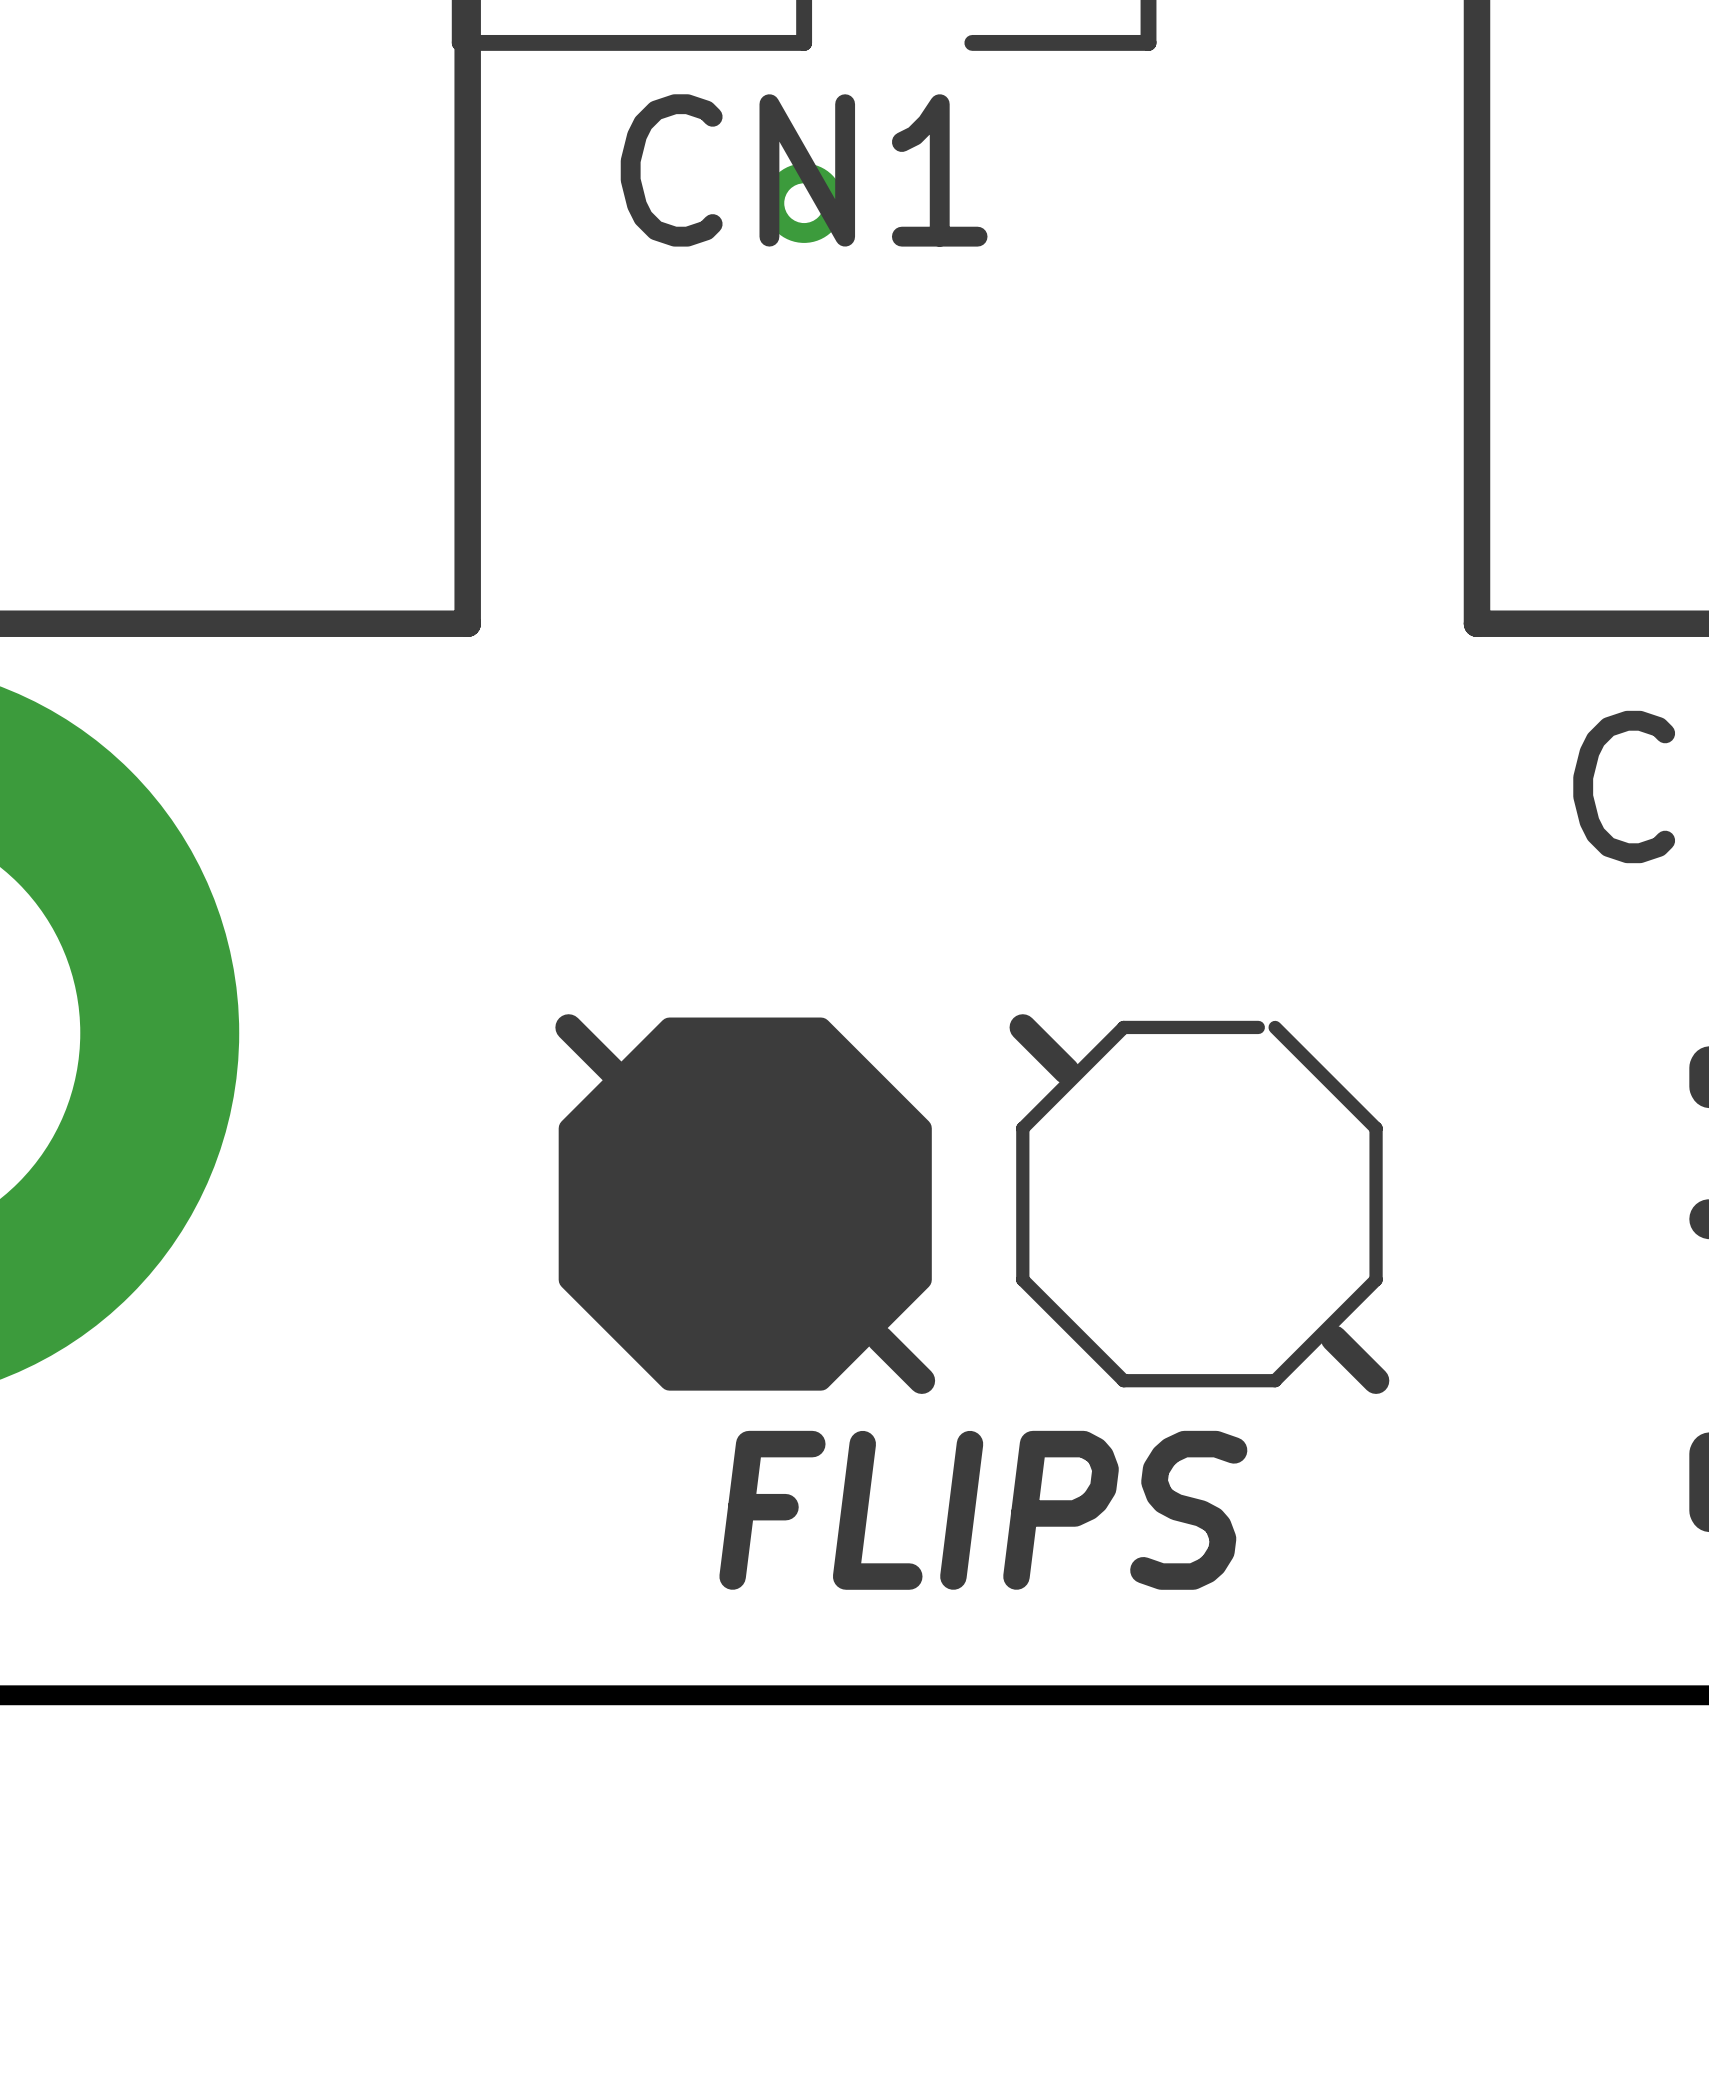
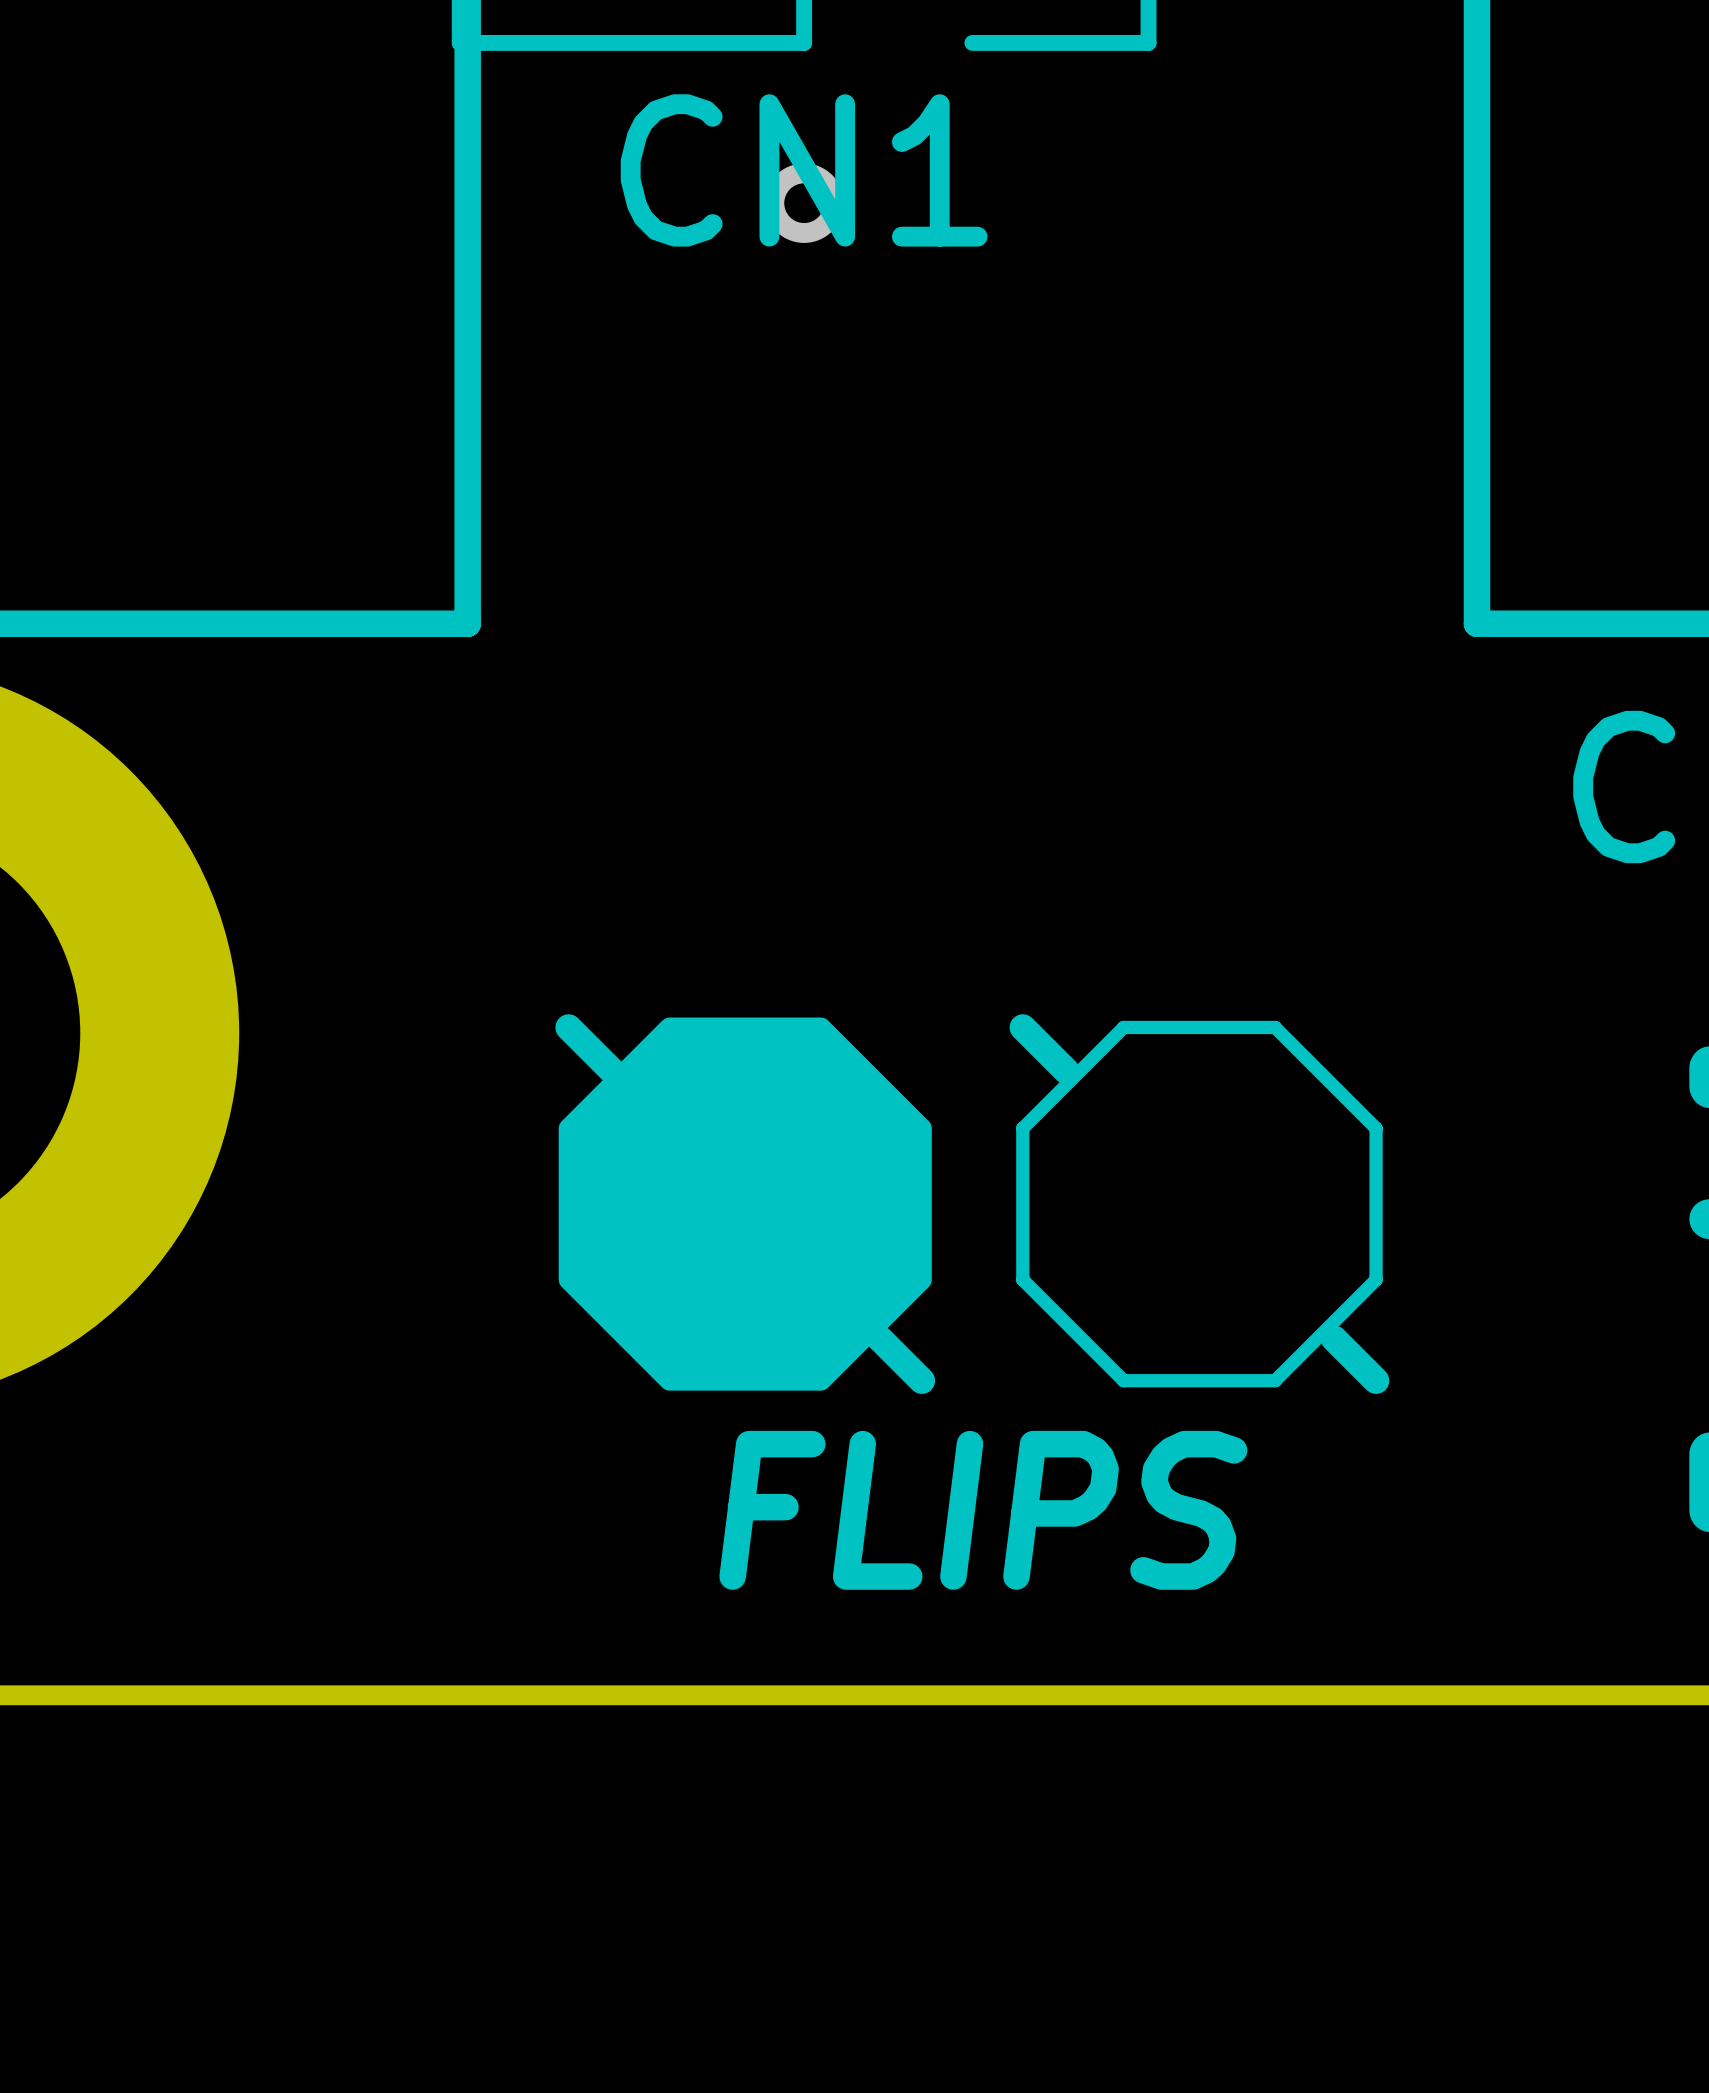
drawing shape: [555, 1014, 1390, 1590] -> [555, 1014, 1390, 1590]

